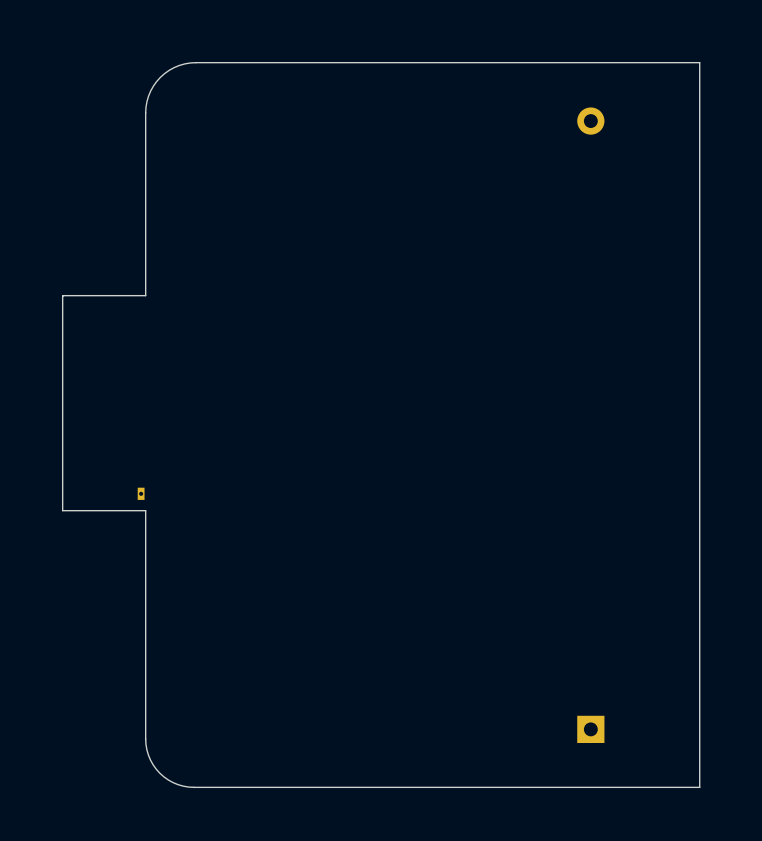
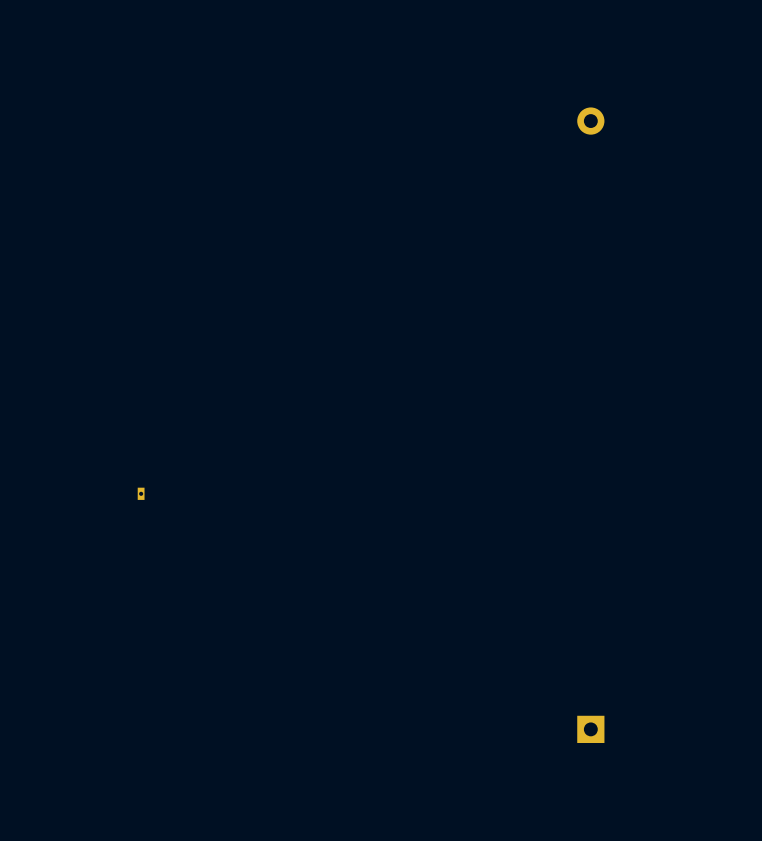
board edge: (699, 62) (195, 62) (174, 67) (156, 81) (148, 96) (145, 112) (145, 295) (62, 295) (62, 510) (145, 510) (145, 744) (150, 760) (163, 776) (178, 784) (193, 787) (699, 787) (699, 62) -> none

